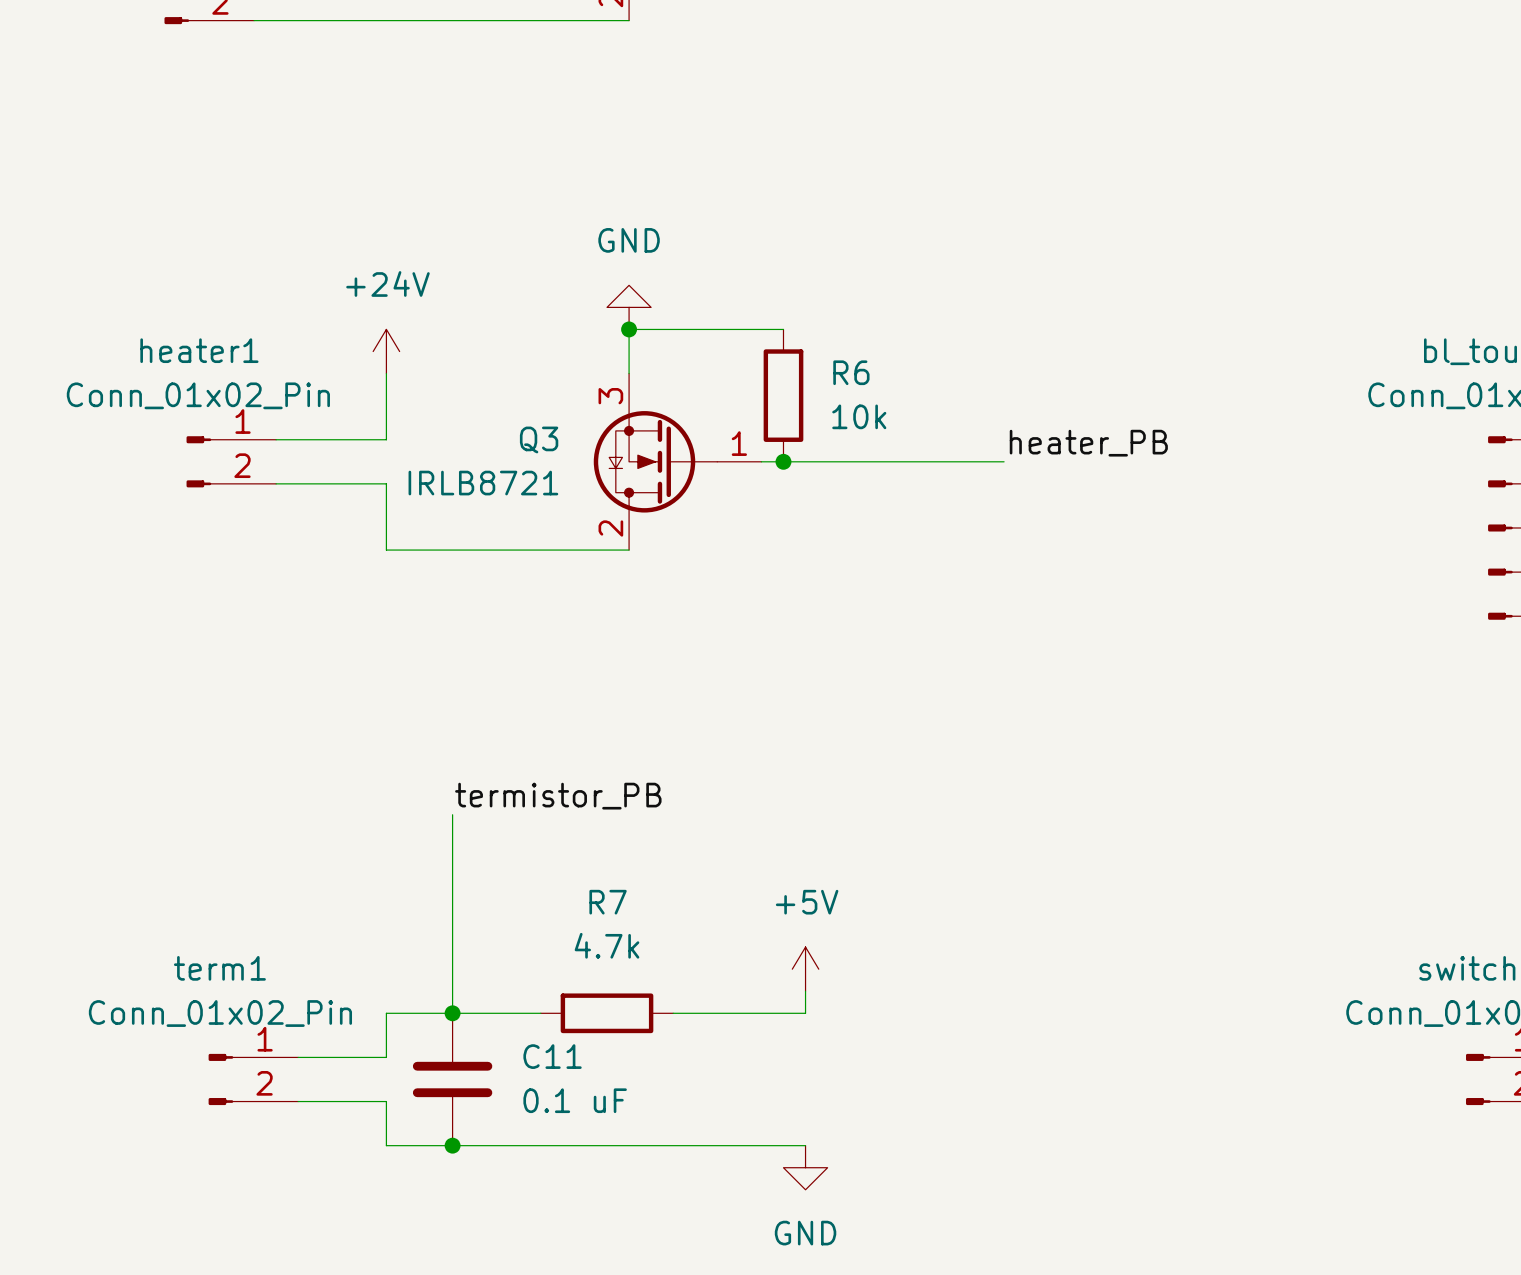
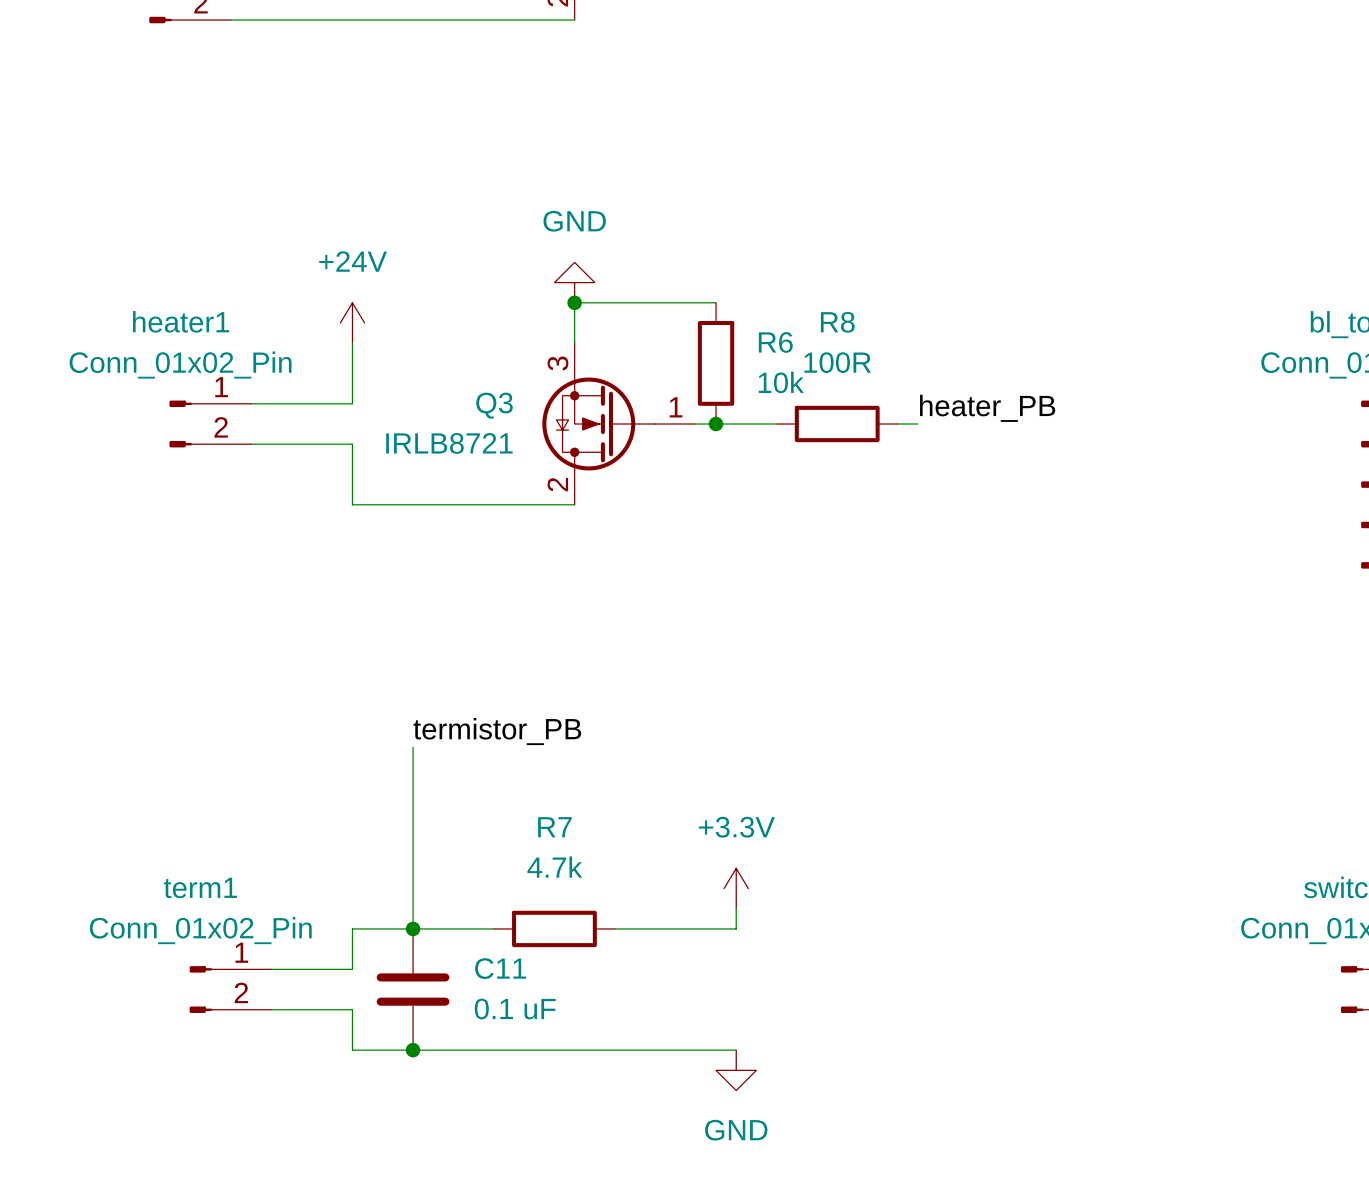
wire: (849, 461) (982, 461) -> none
R8: none -> 100R (837, 424)
power symbol: +5V (805, 969) -> +3.3V (736, 888)

